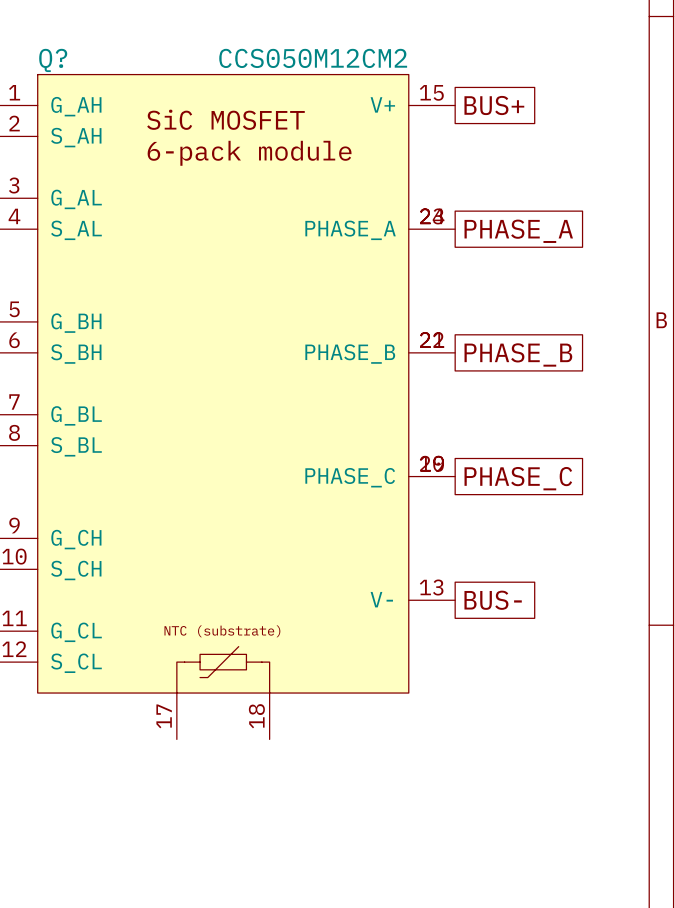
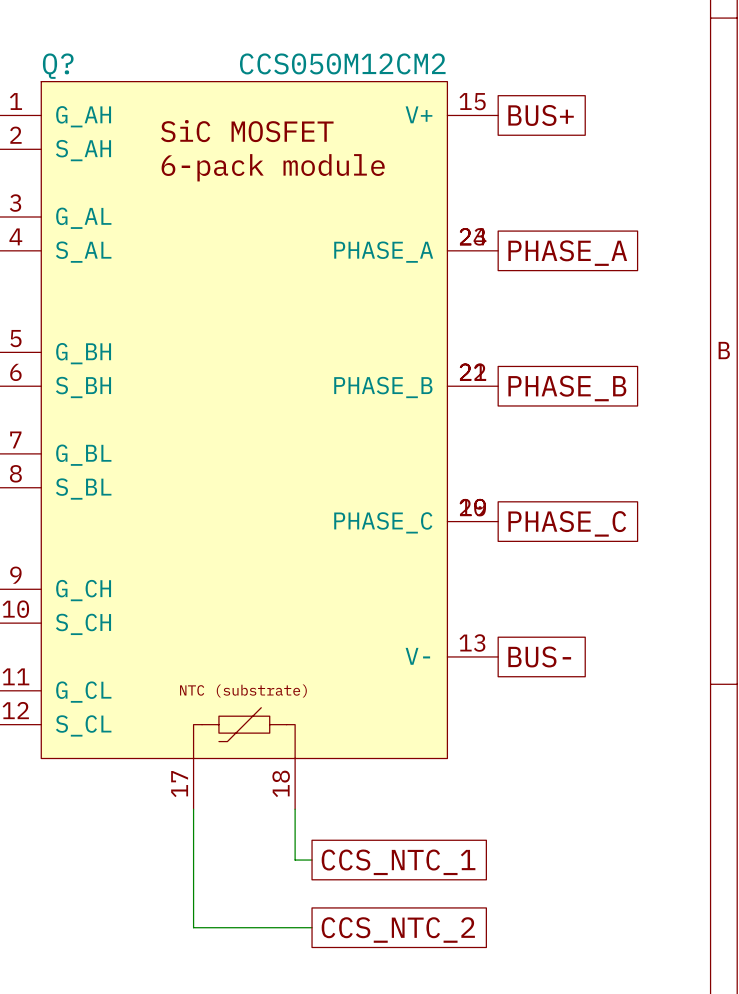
wire: none -> (193, 809) (193, 927) (312, 927)
wire: none -> (295, 809) (295, 860) (312, 860)
global label: none -> CCS_NTC_1 (398, 862)
global label: none -> CCS_NTC_2 (398, 930)

